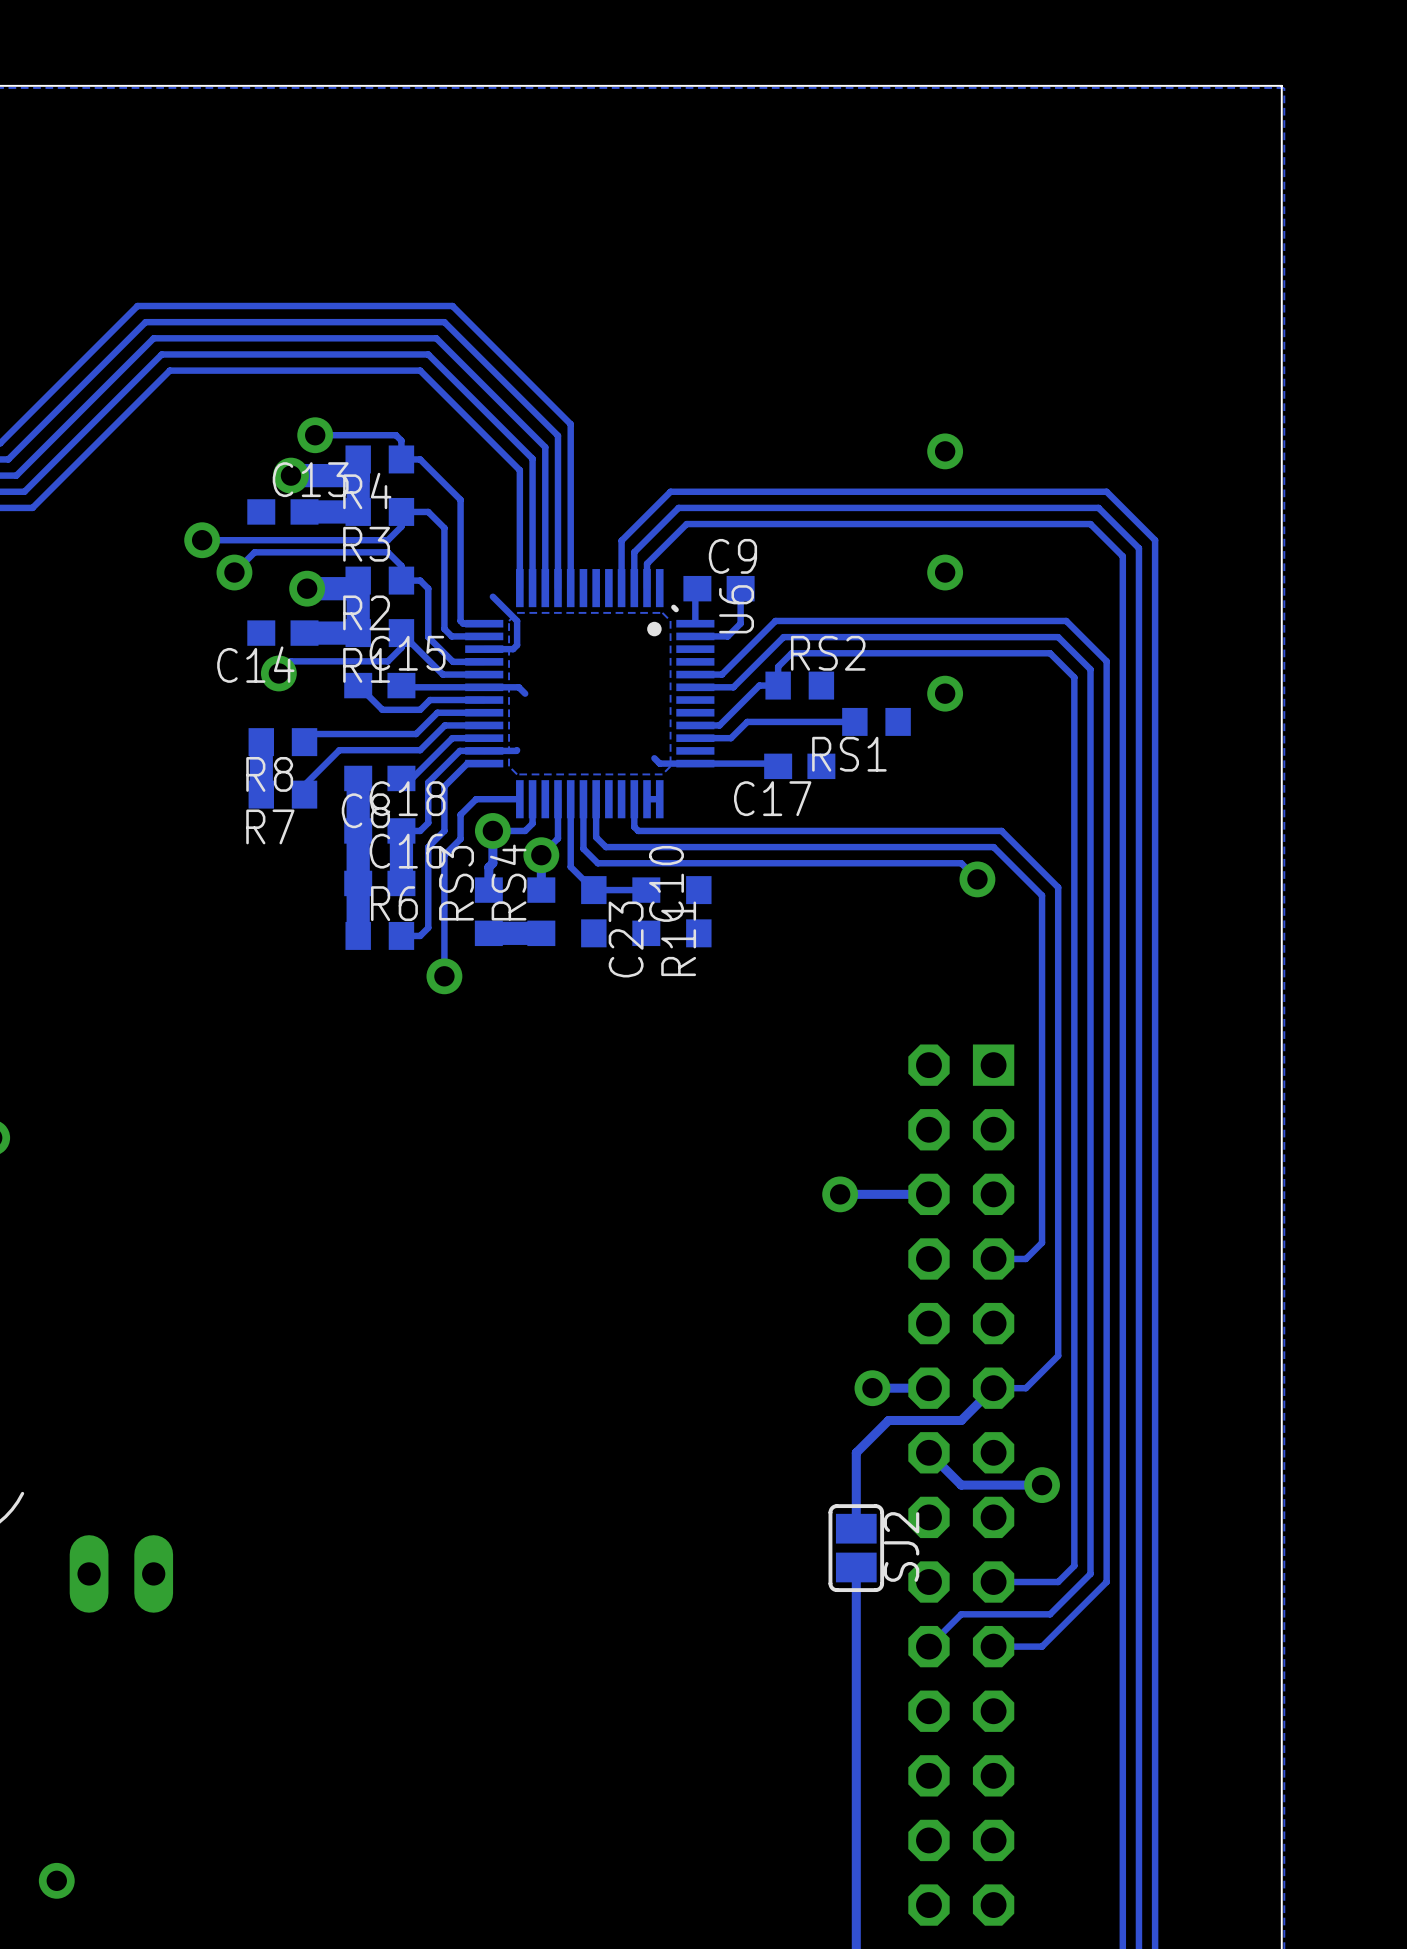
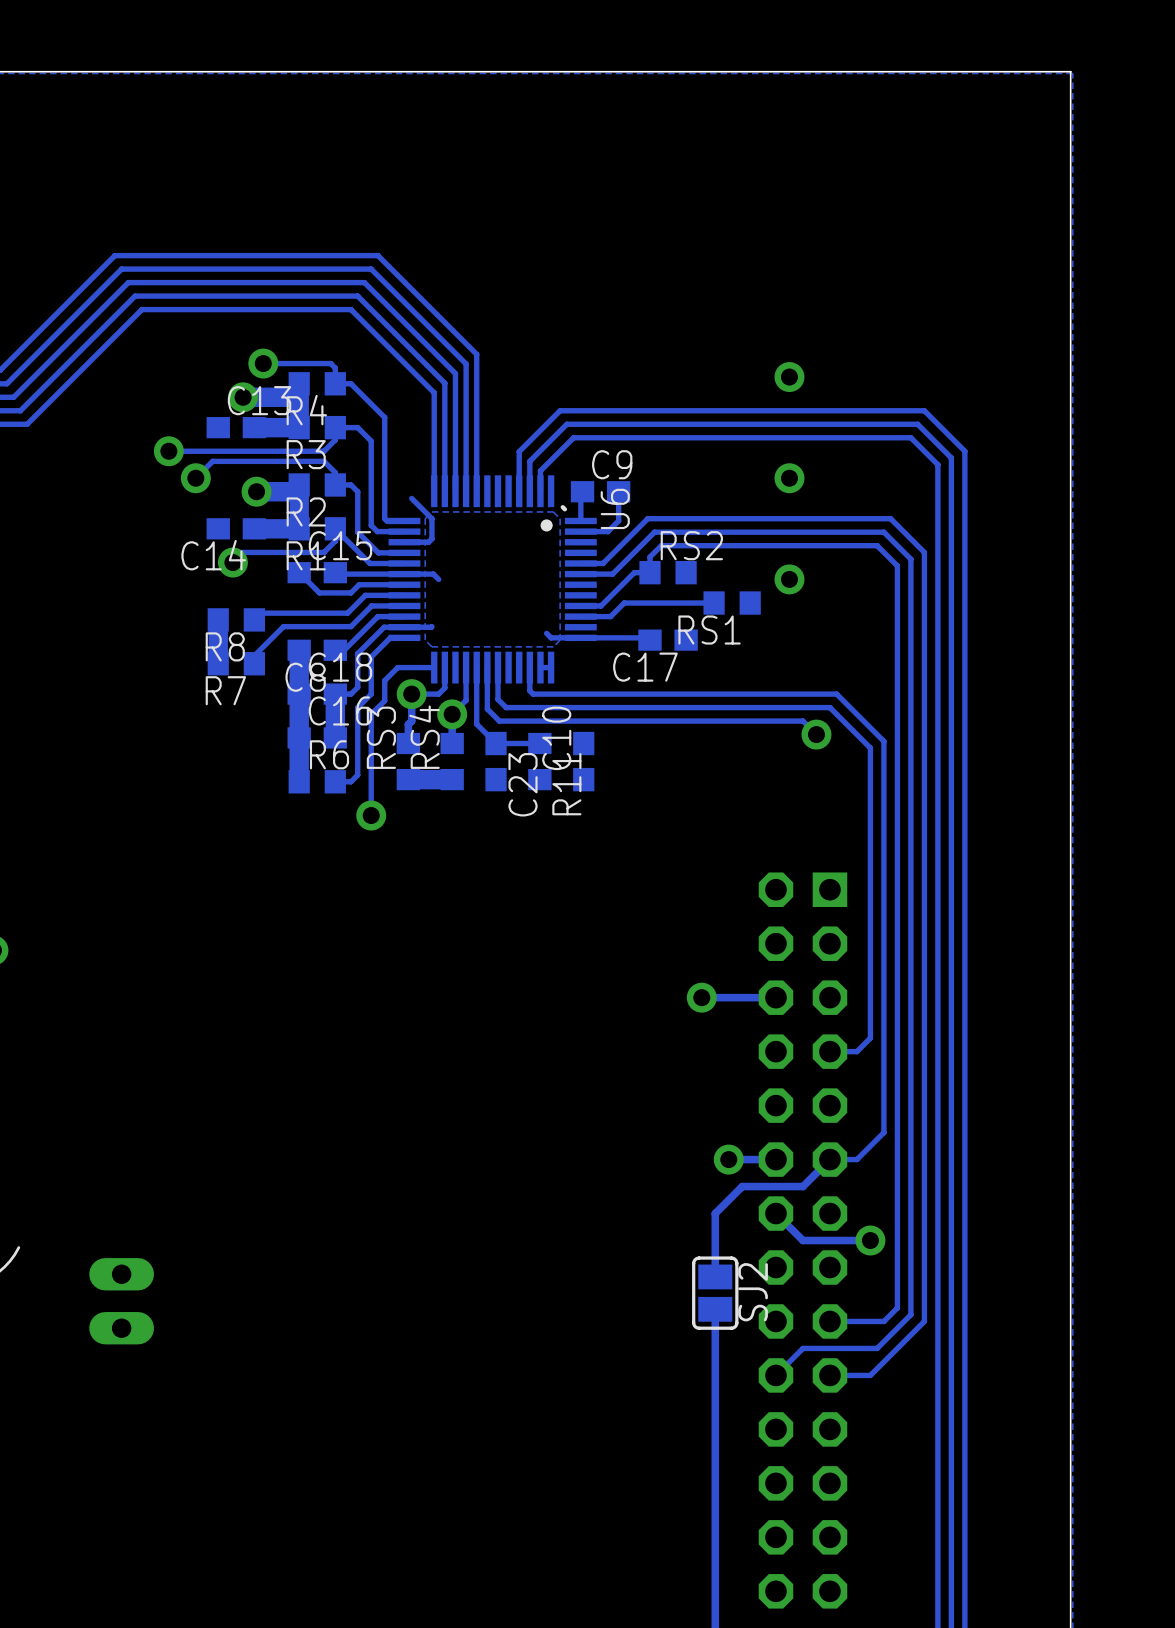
part rotation: 0° (121, 1573) -> 90° clockwise (121, 1301)
via: (56, 1880) -> none

